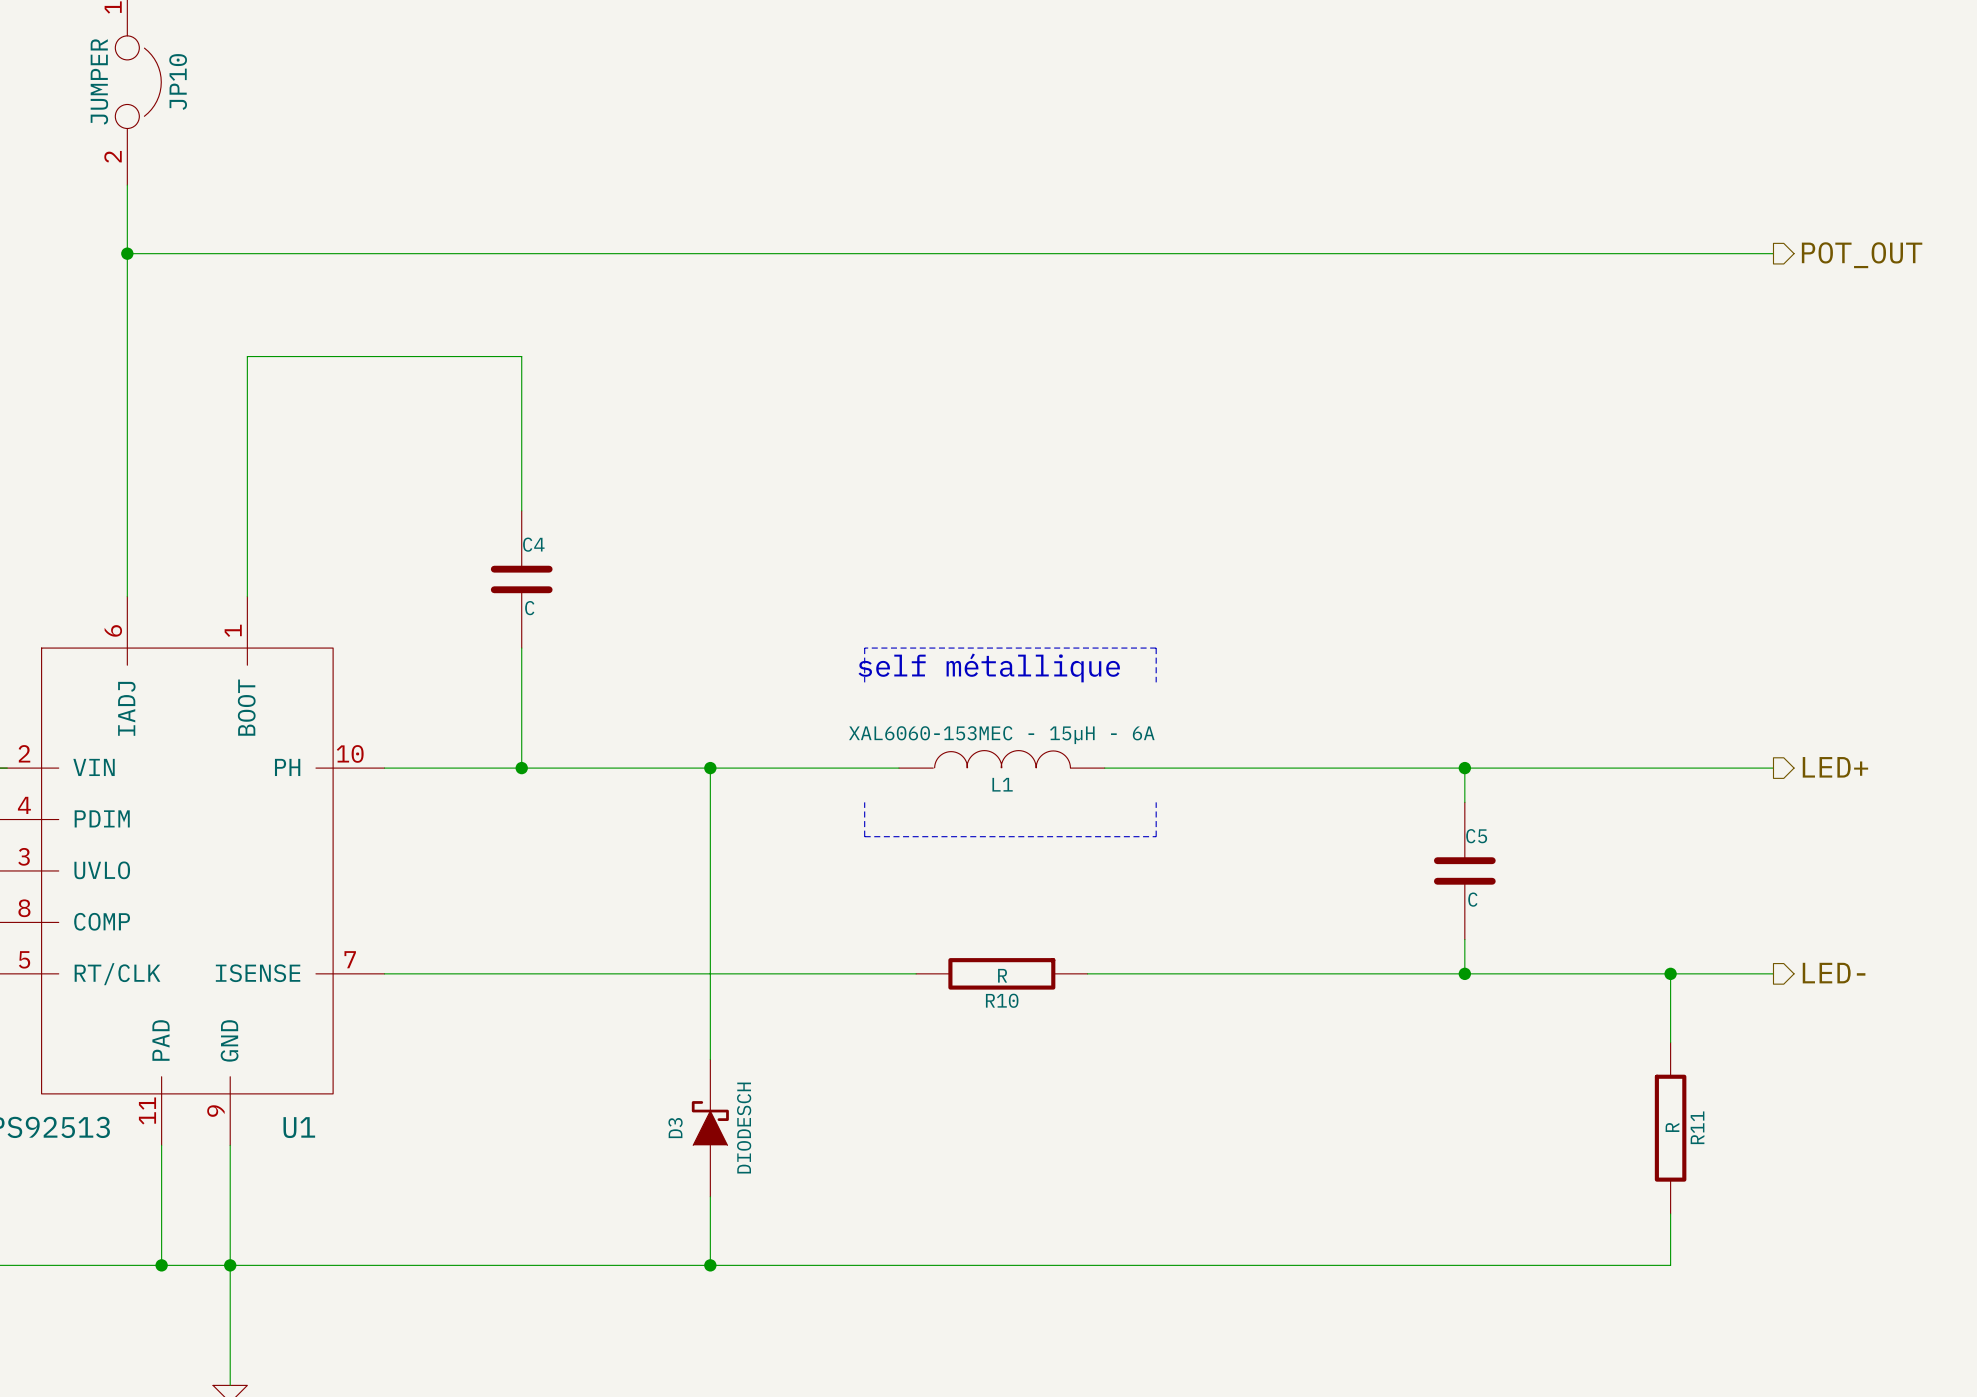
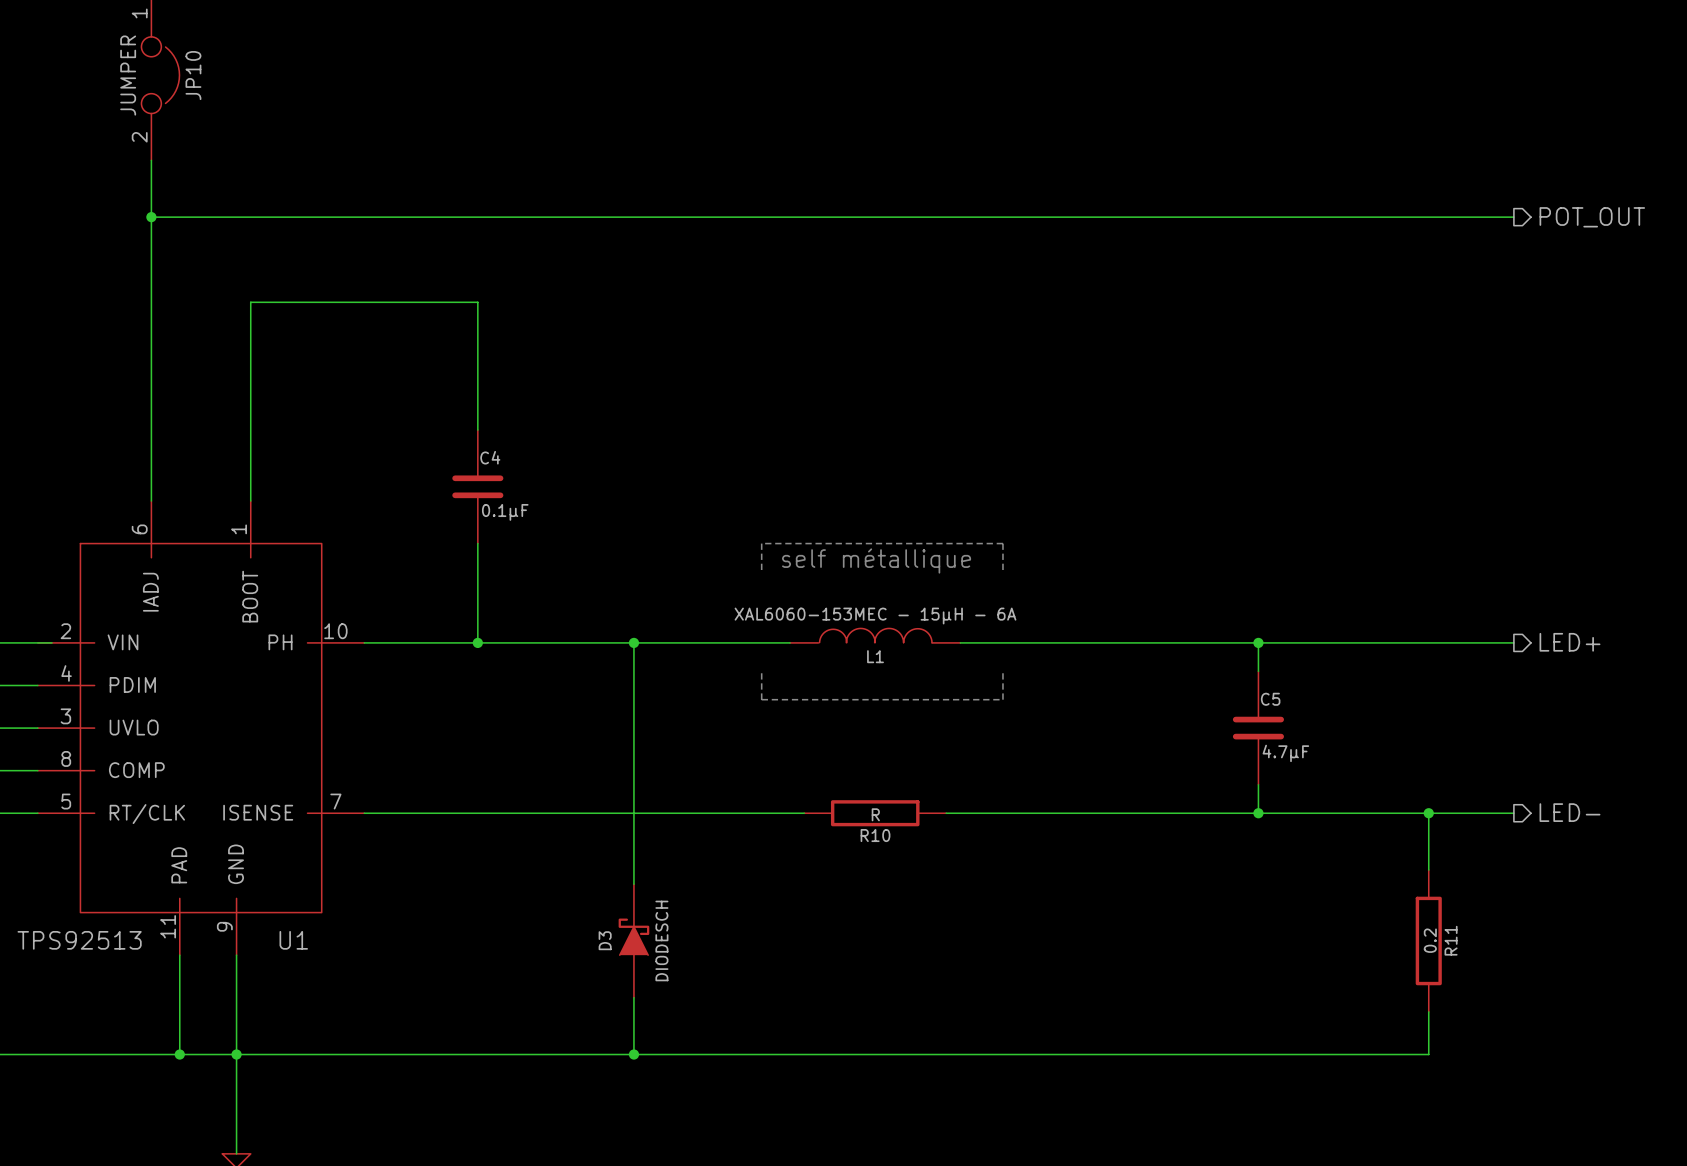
C4 value: C (529, 608) -> 0.1µF (505, 512)
C5 value: C (1472, 899) -> 4.7µF (1285, 753)
R11 value: R (1672, 1127) -> 0.2 (1430, 940)

